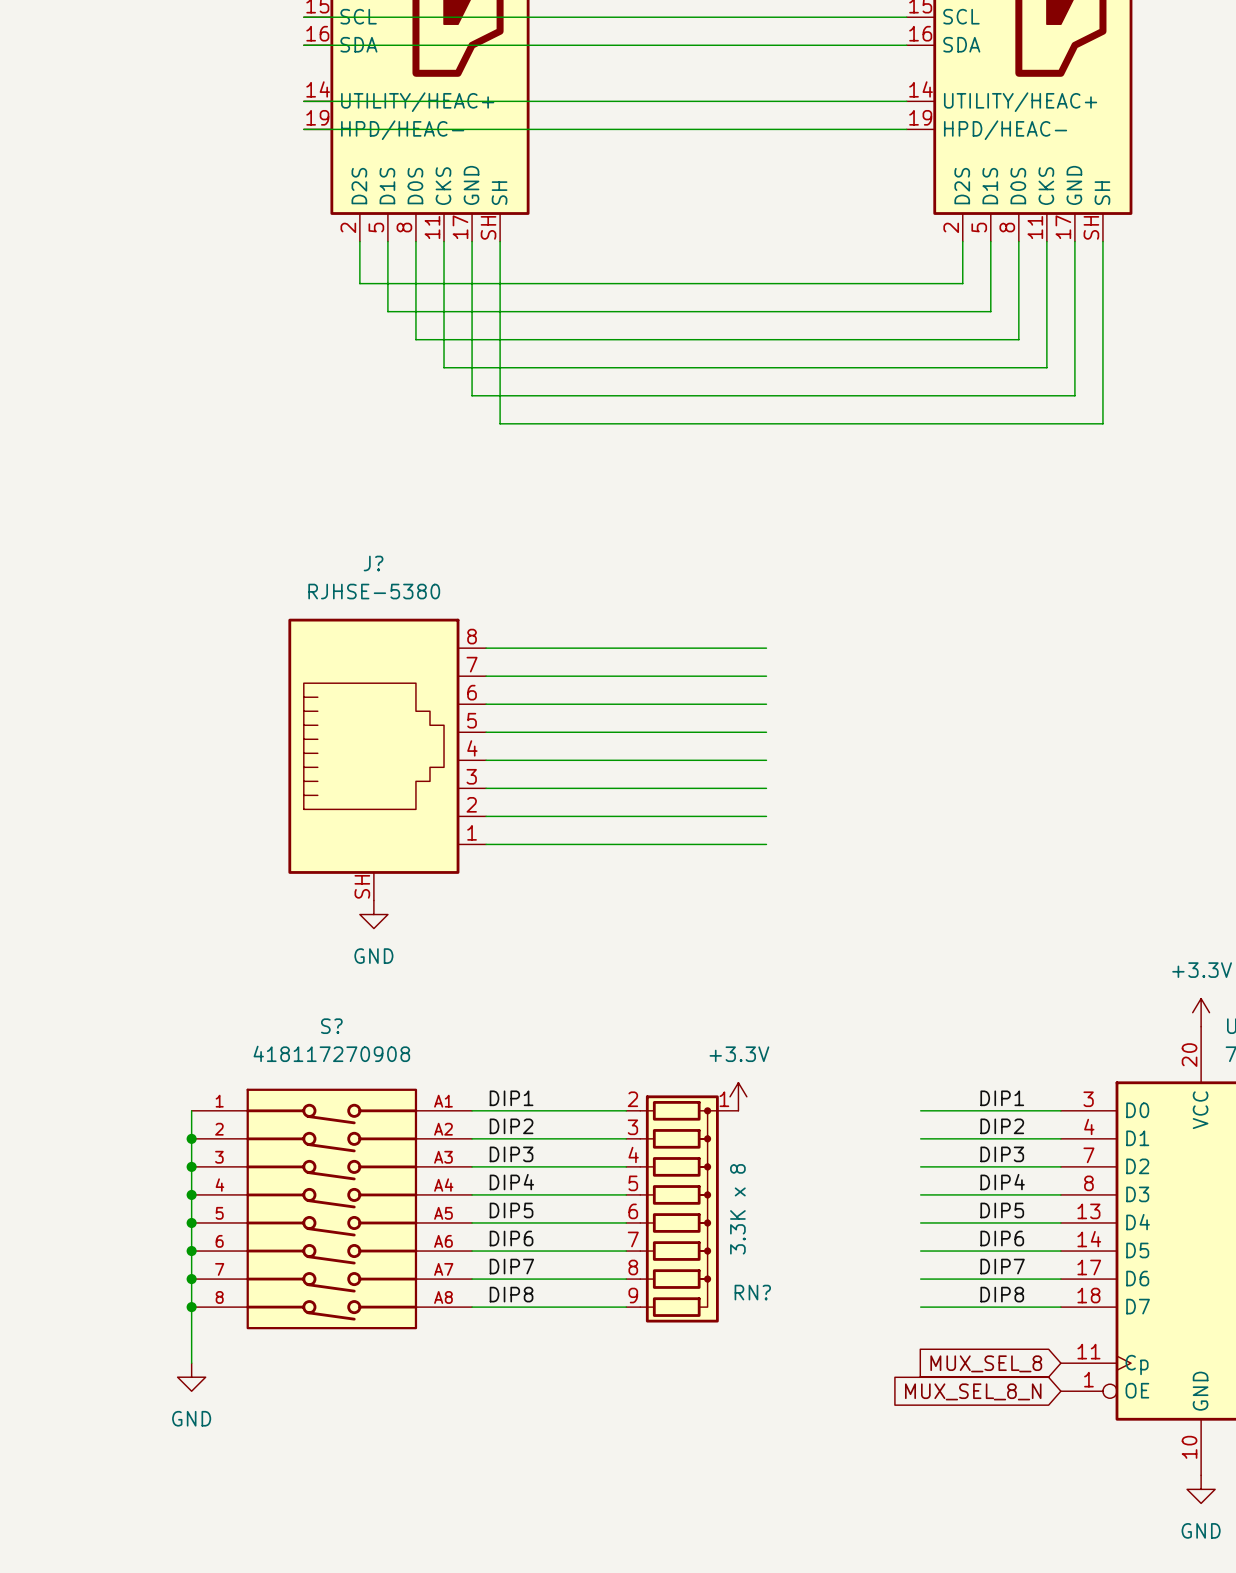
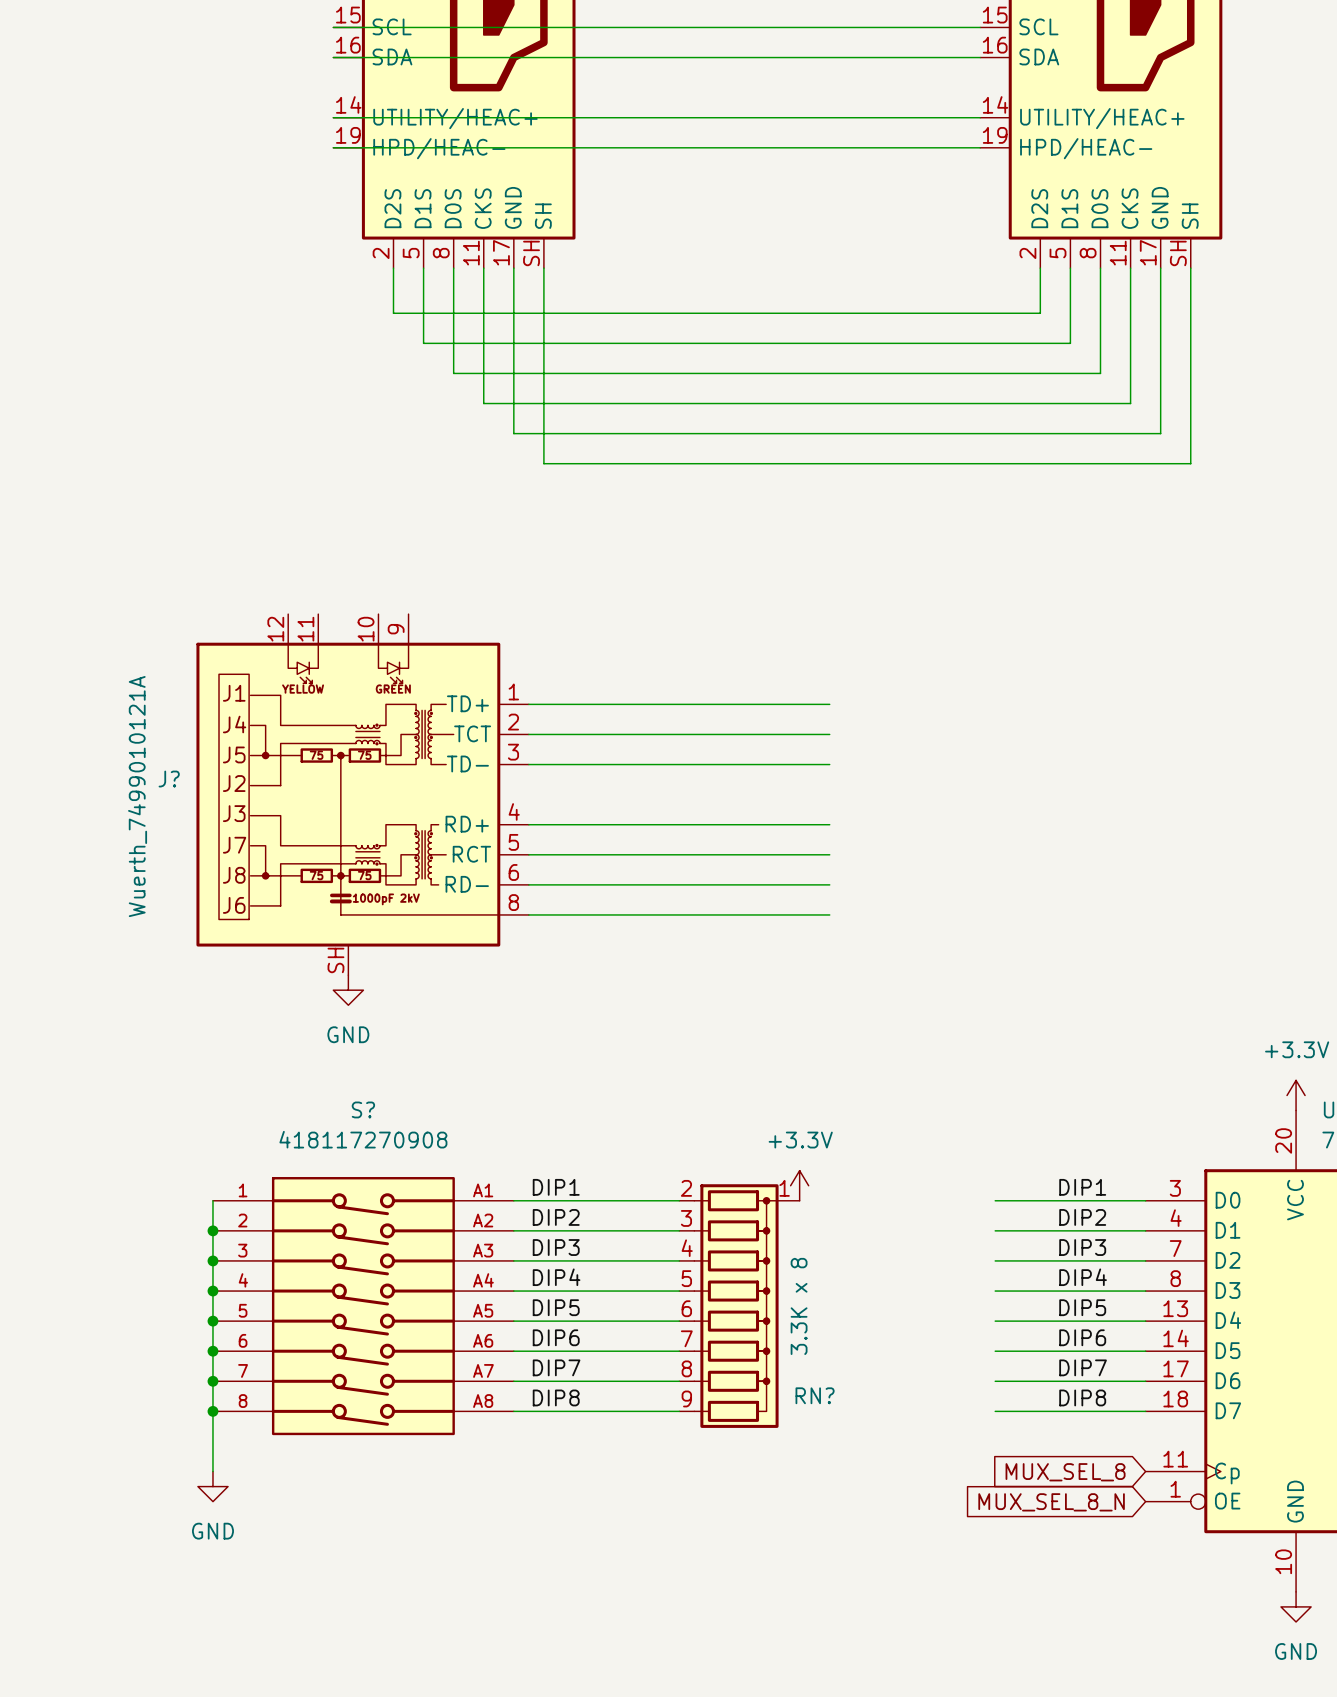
J?: none -> Wuerth_7499010121A (362, 794)
wire: (486, 732) (766, 732) -> none
J?: RJHSE-5380 (387, 759) -> none
power symbol position: GND (373, 914) -> GND (348, 990)

